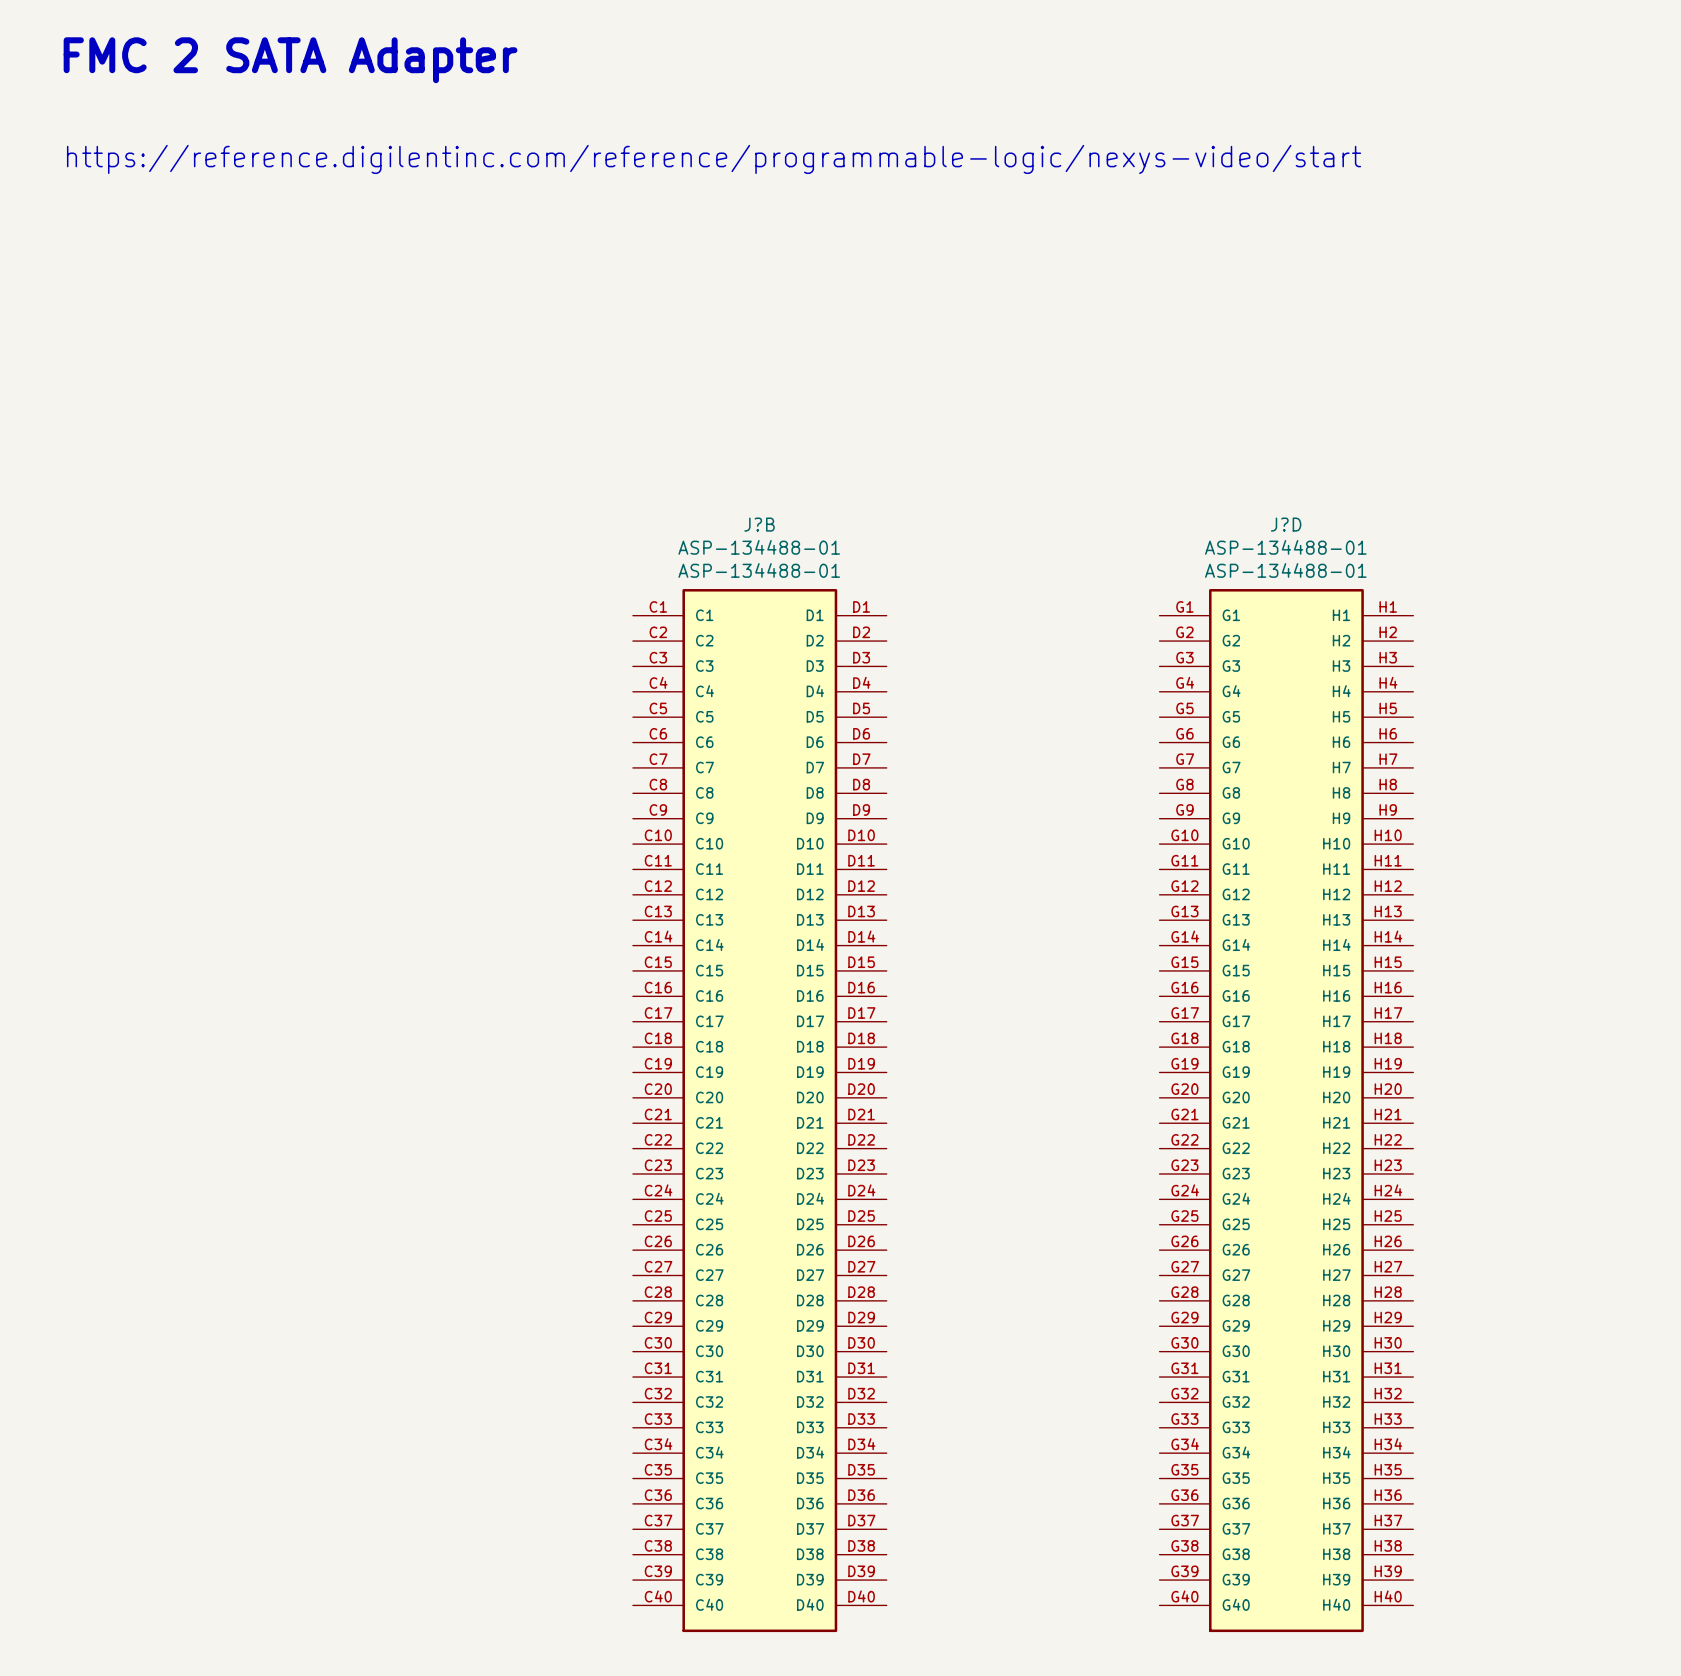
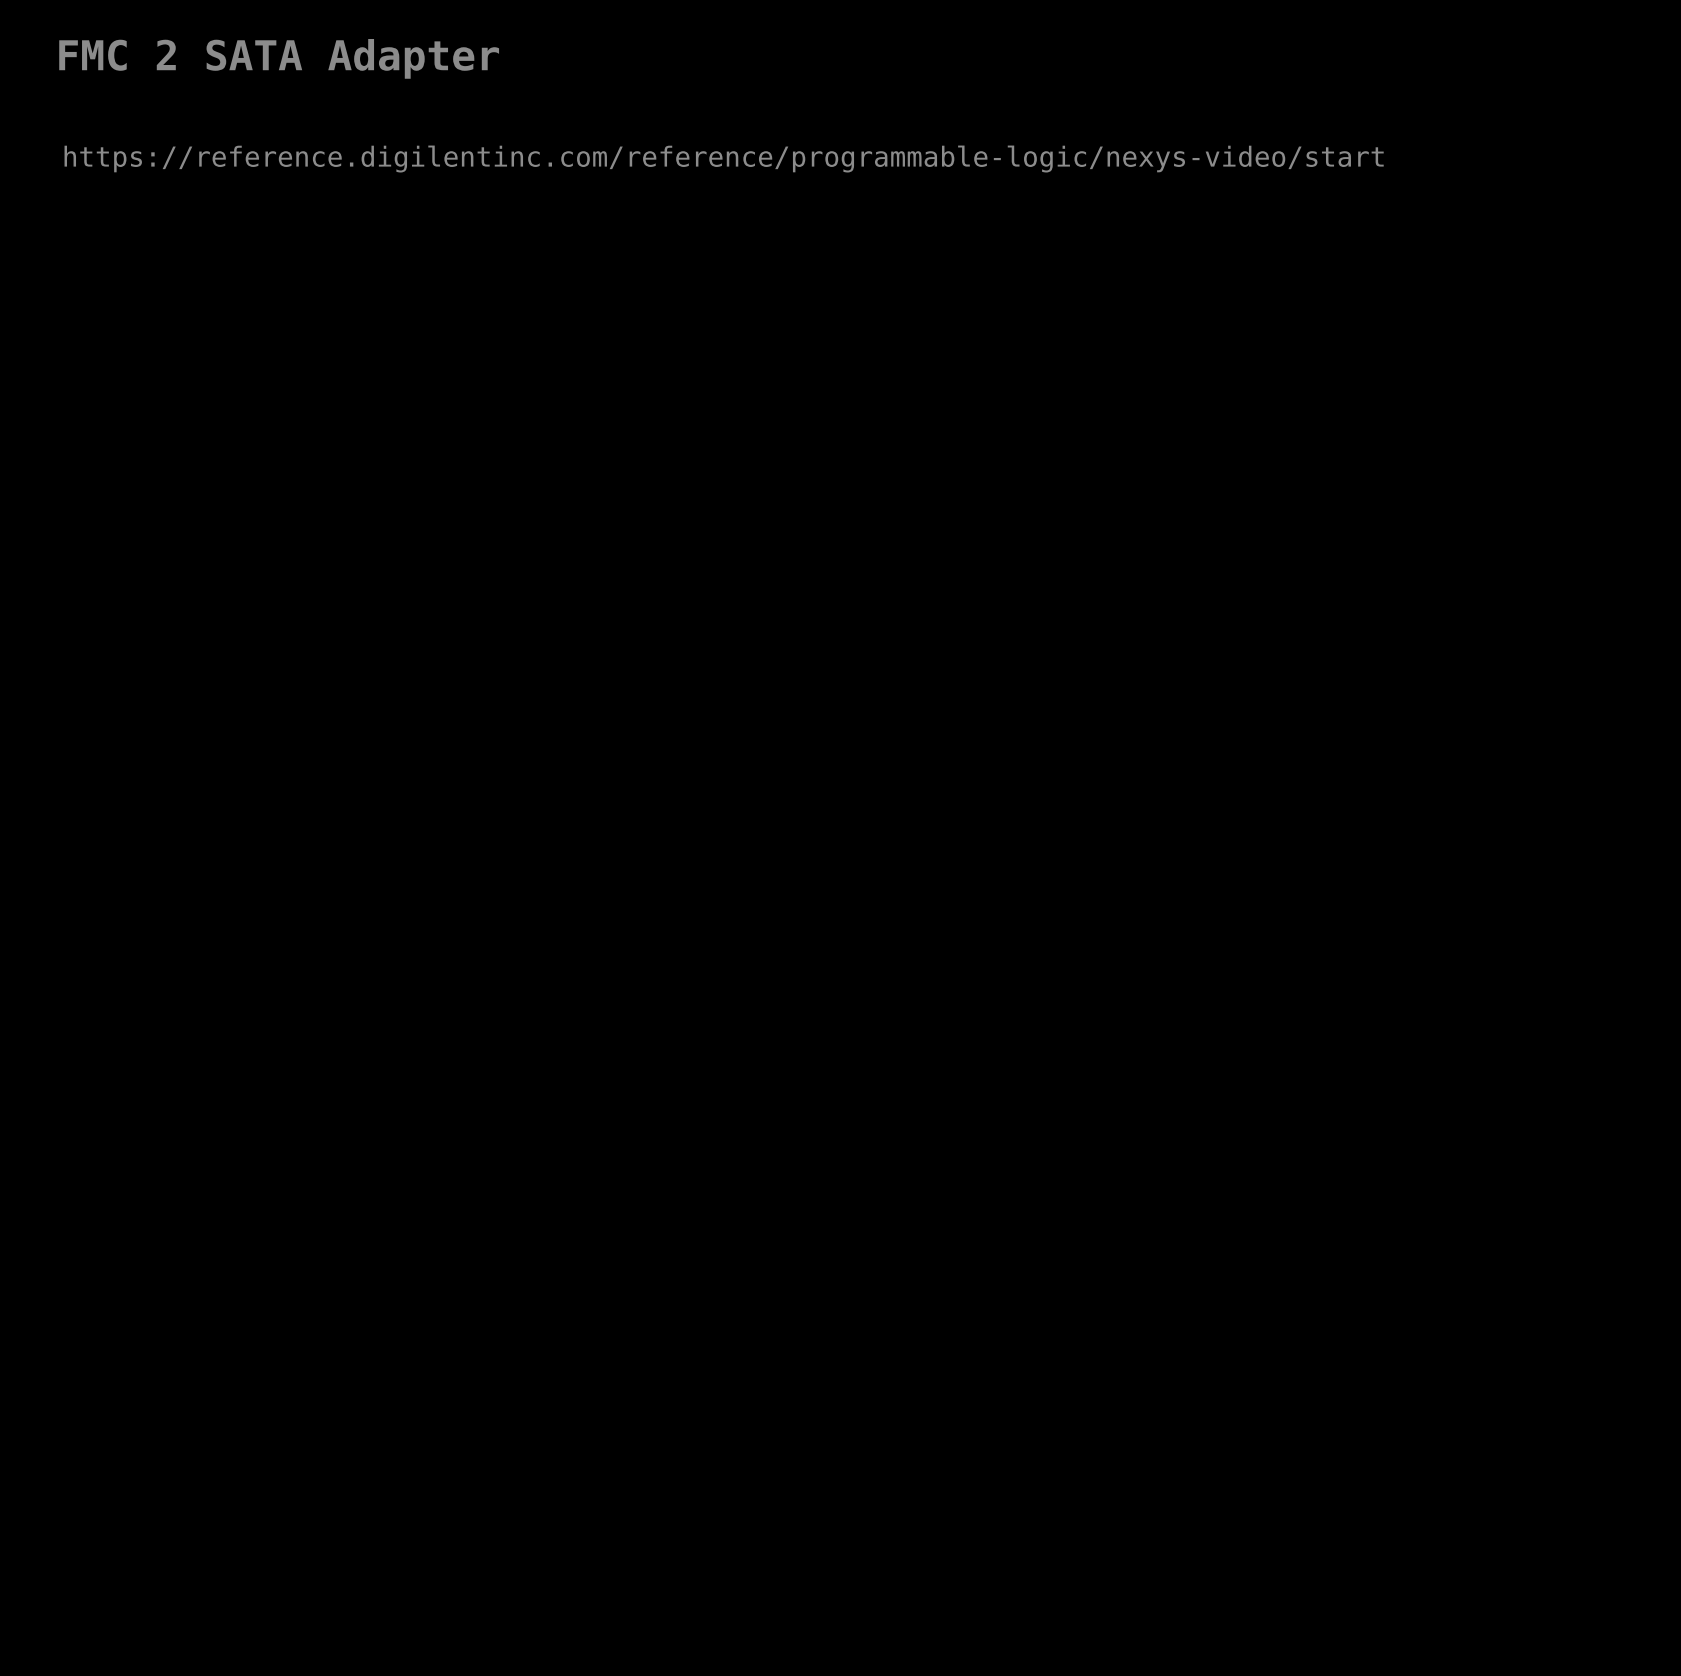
J?B: ASP-134488-01 (759, 1110) -> none
J?D: ASP-134488-01 (1286, 1110) -> none

